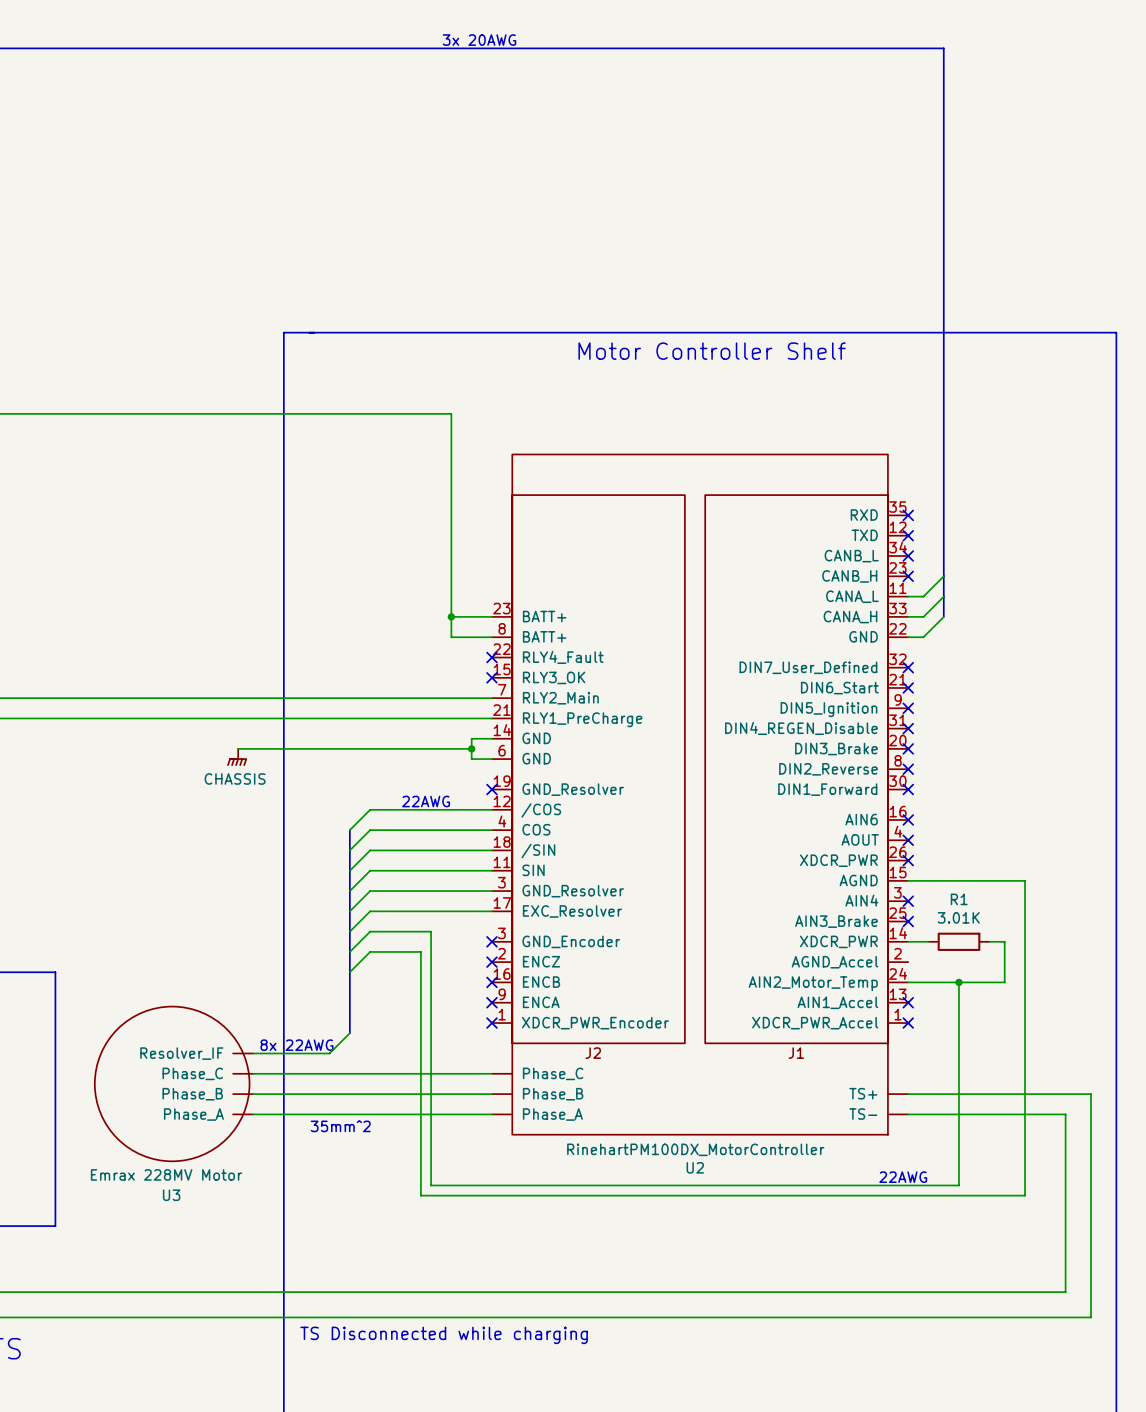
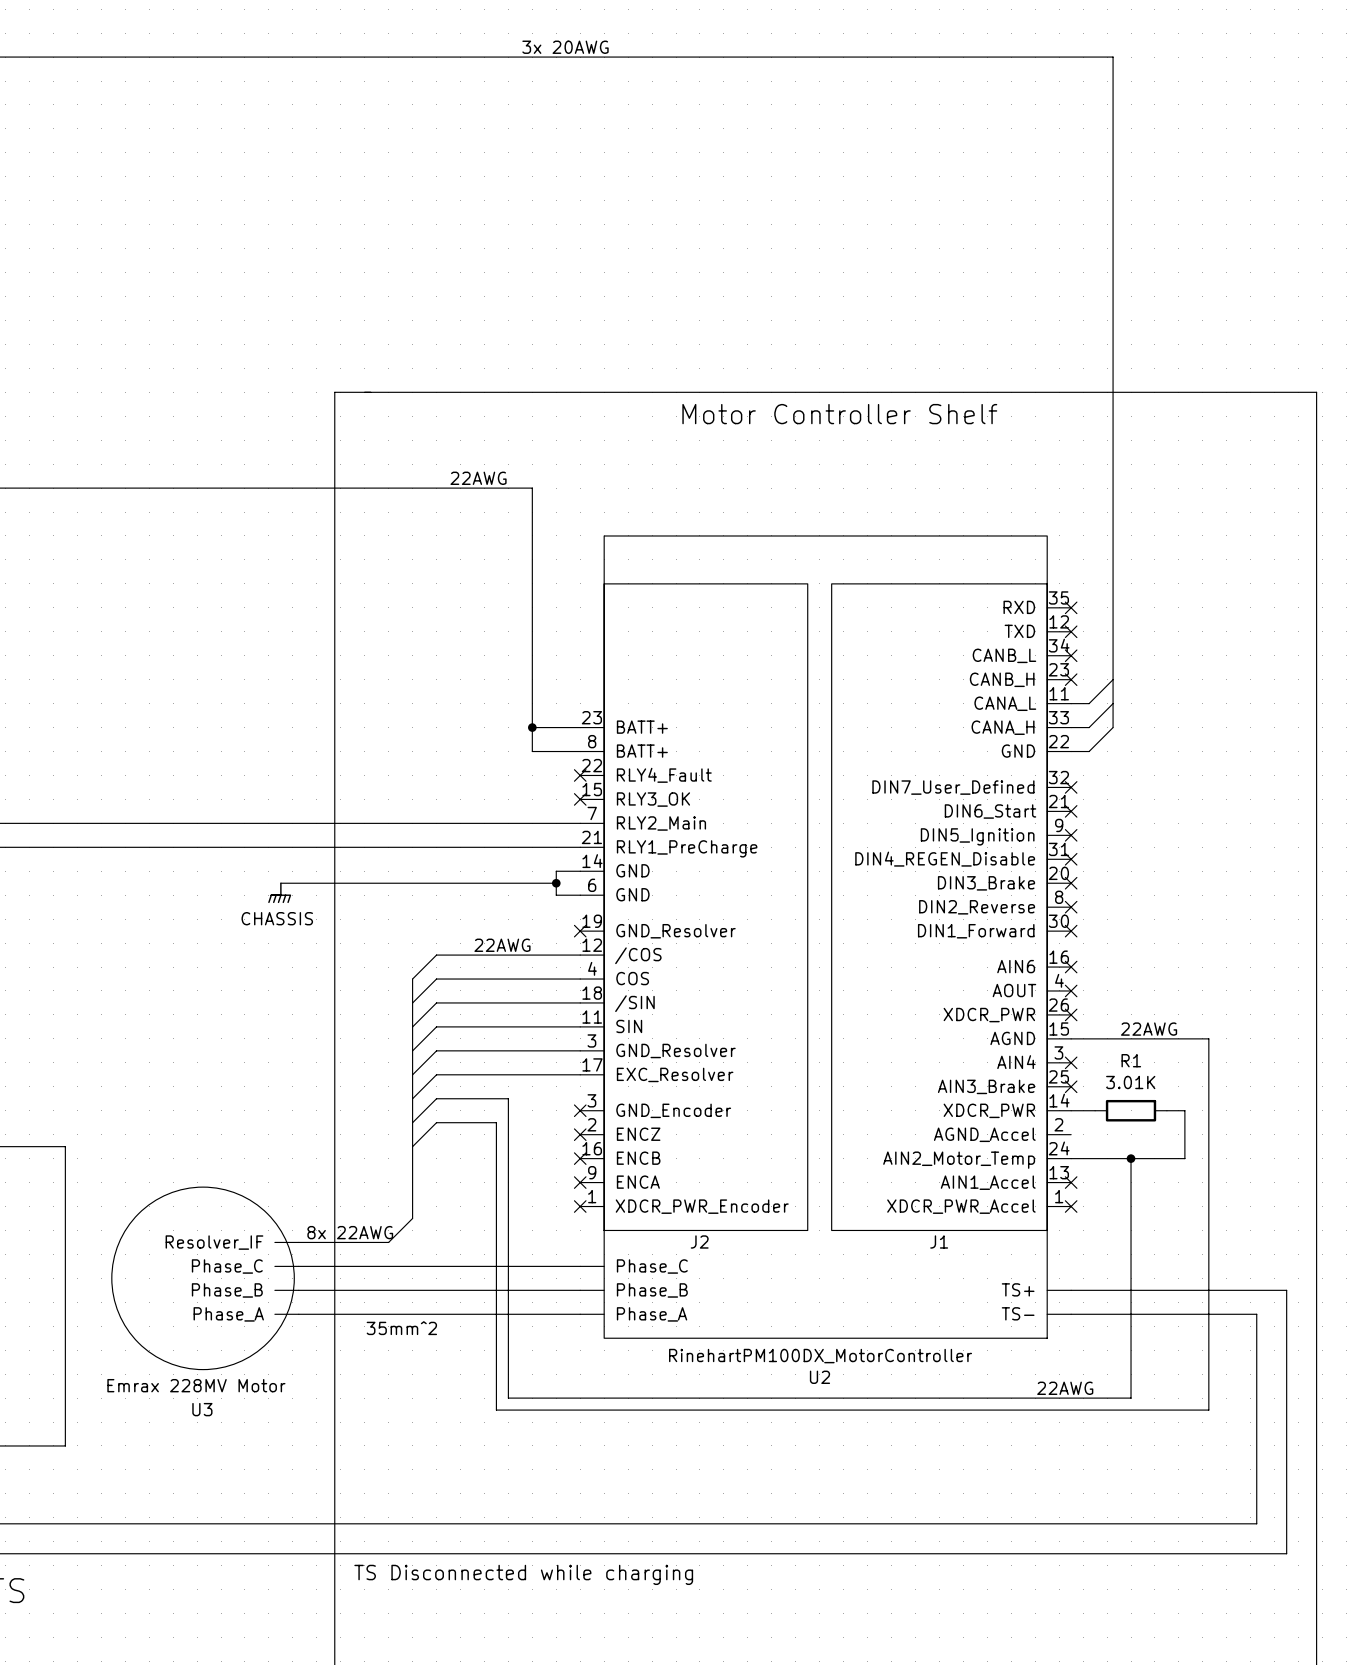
text: none -> 22AWG (478, 478)
text: none -> 22AWG (1149, 1029)

